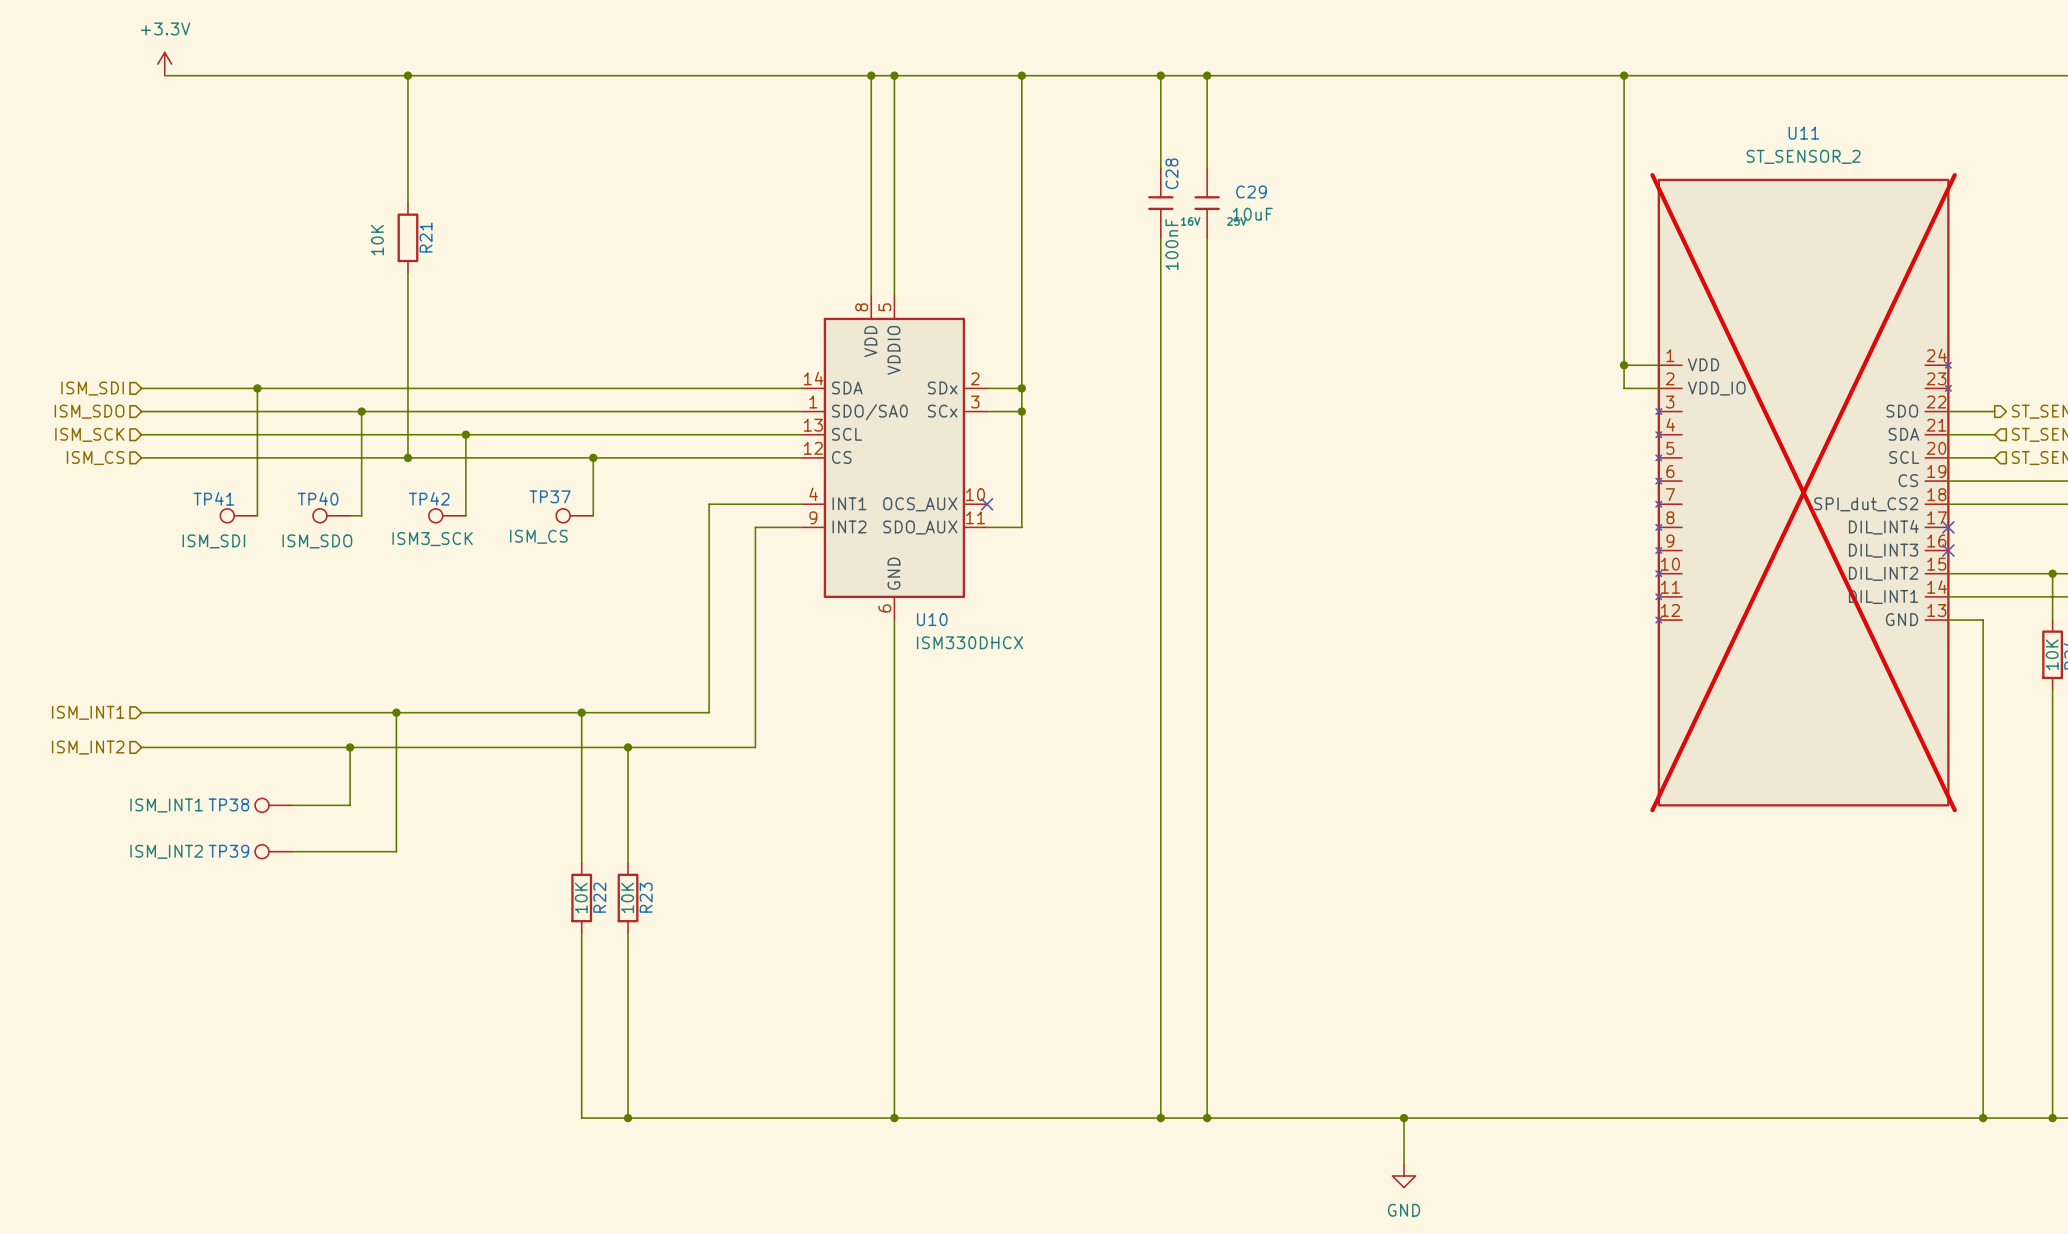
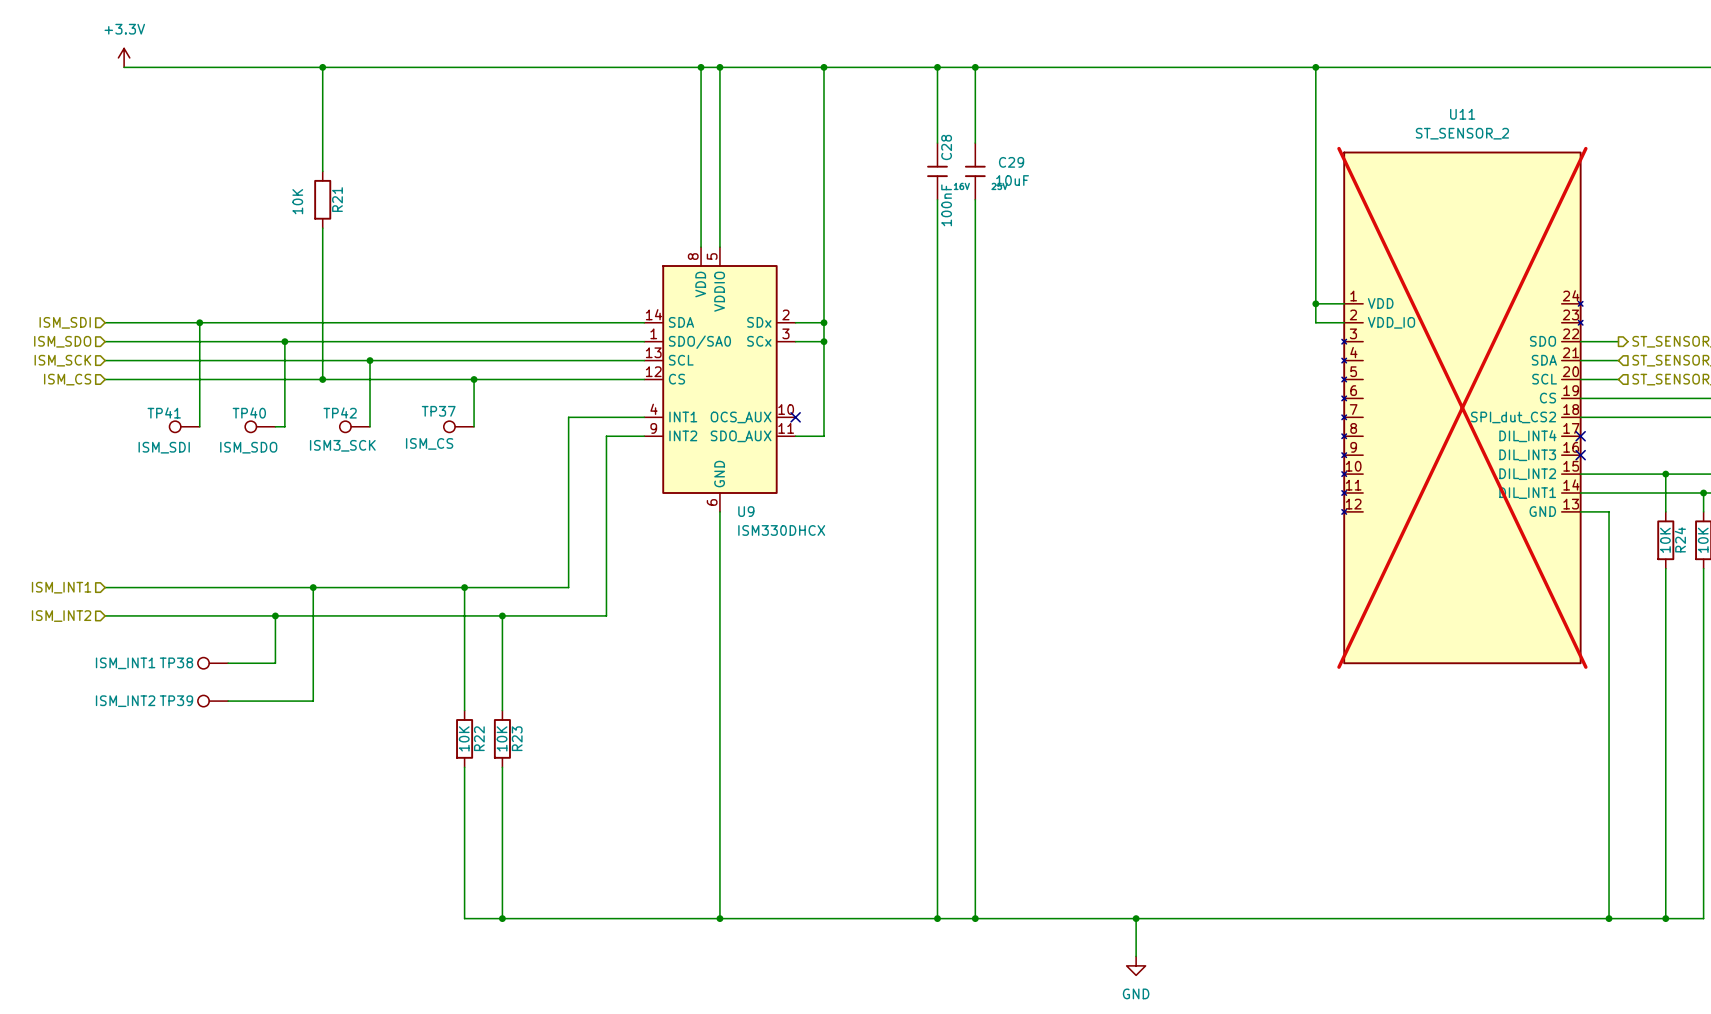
U10 name: U10 (932, 619) -> U9 (746, 511)

